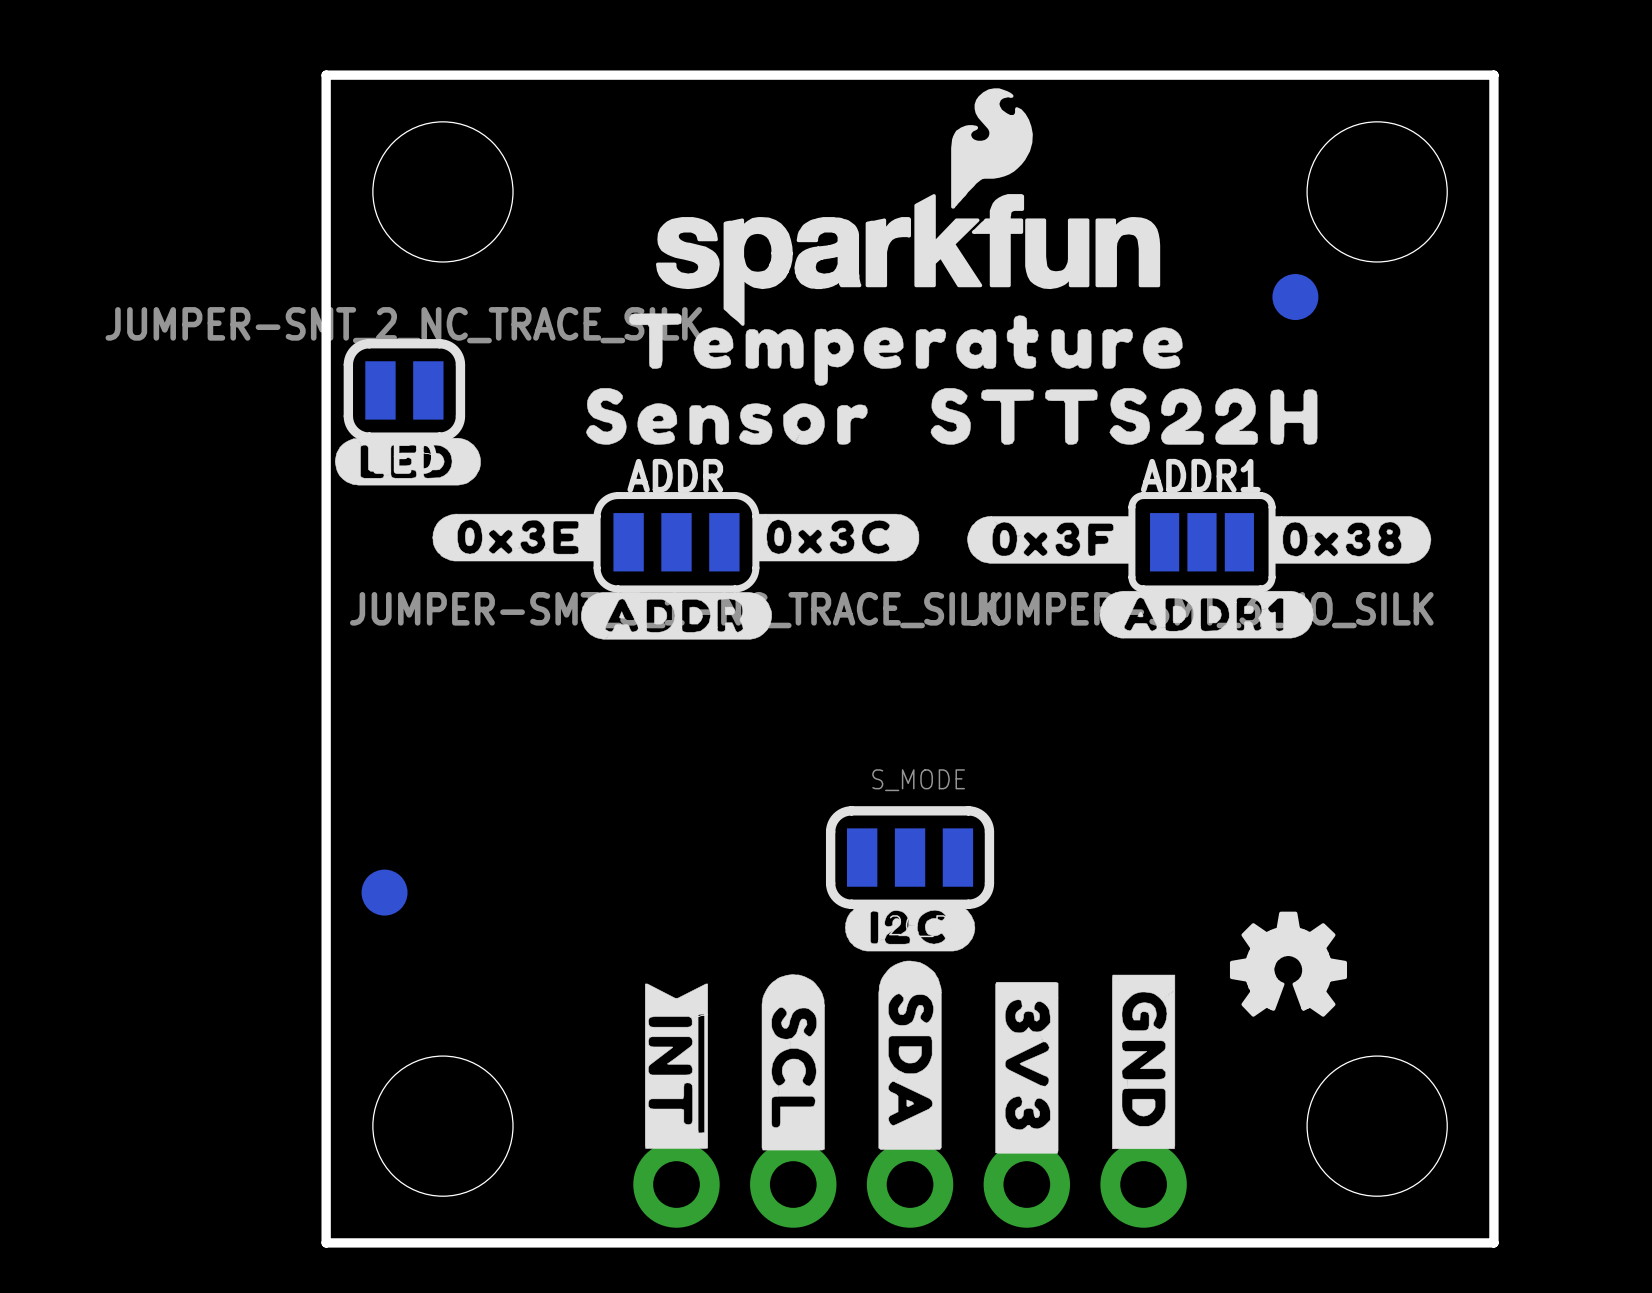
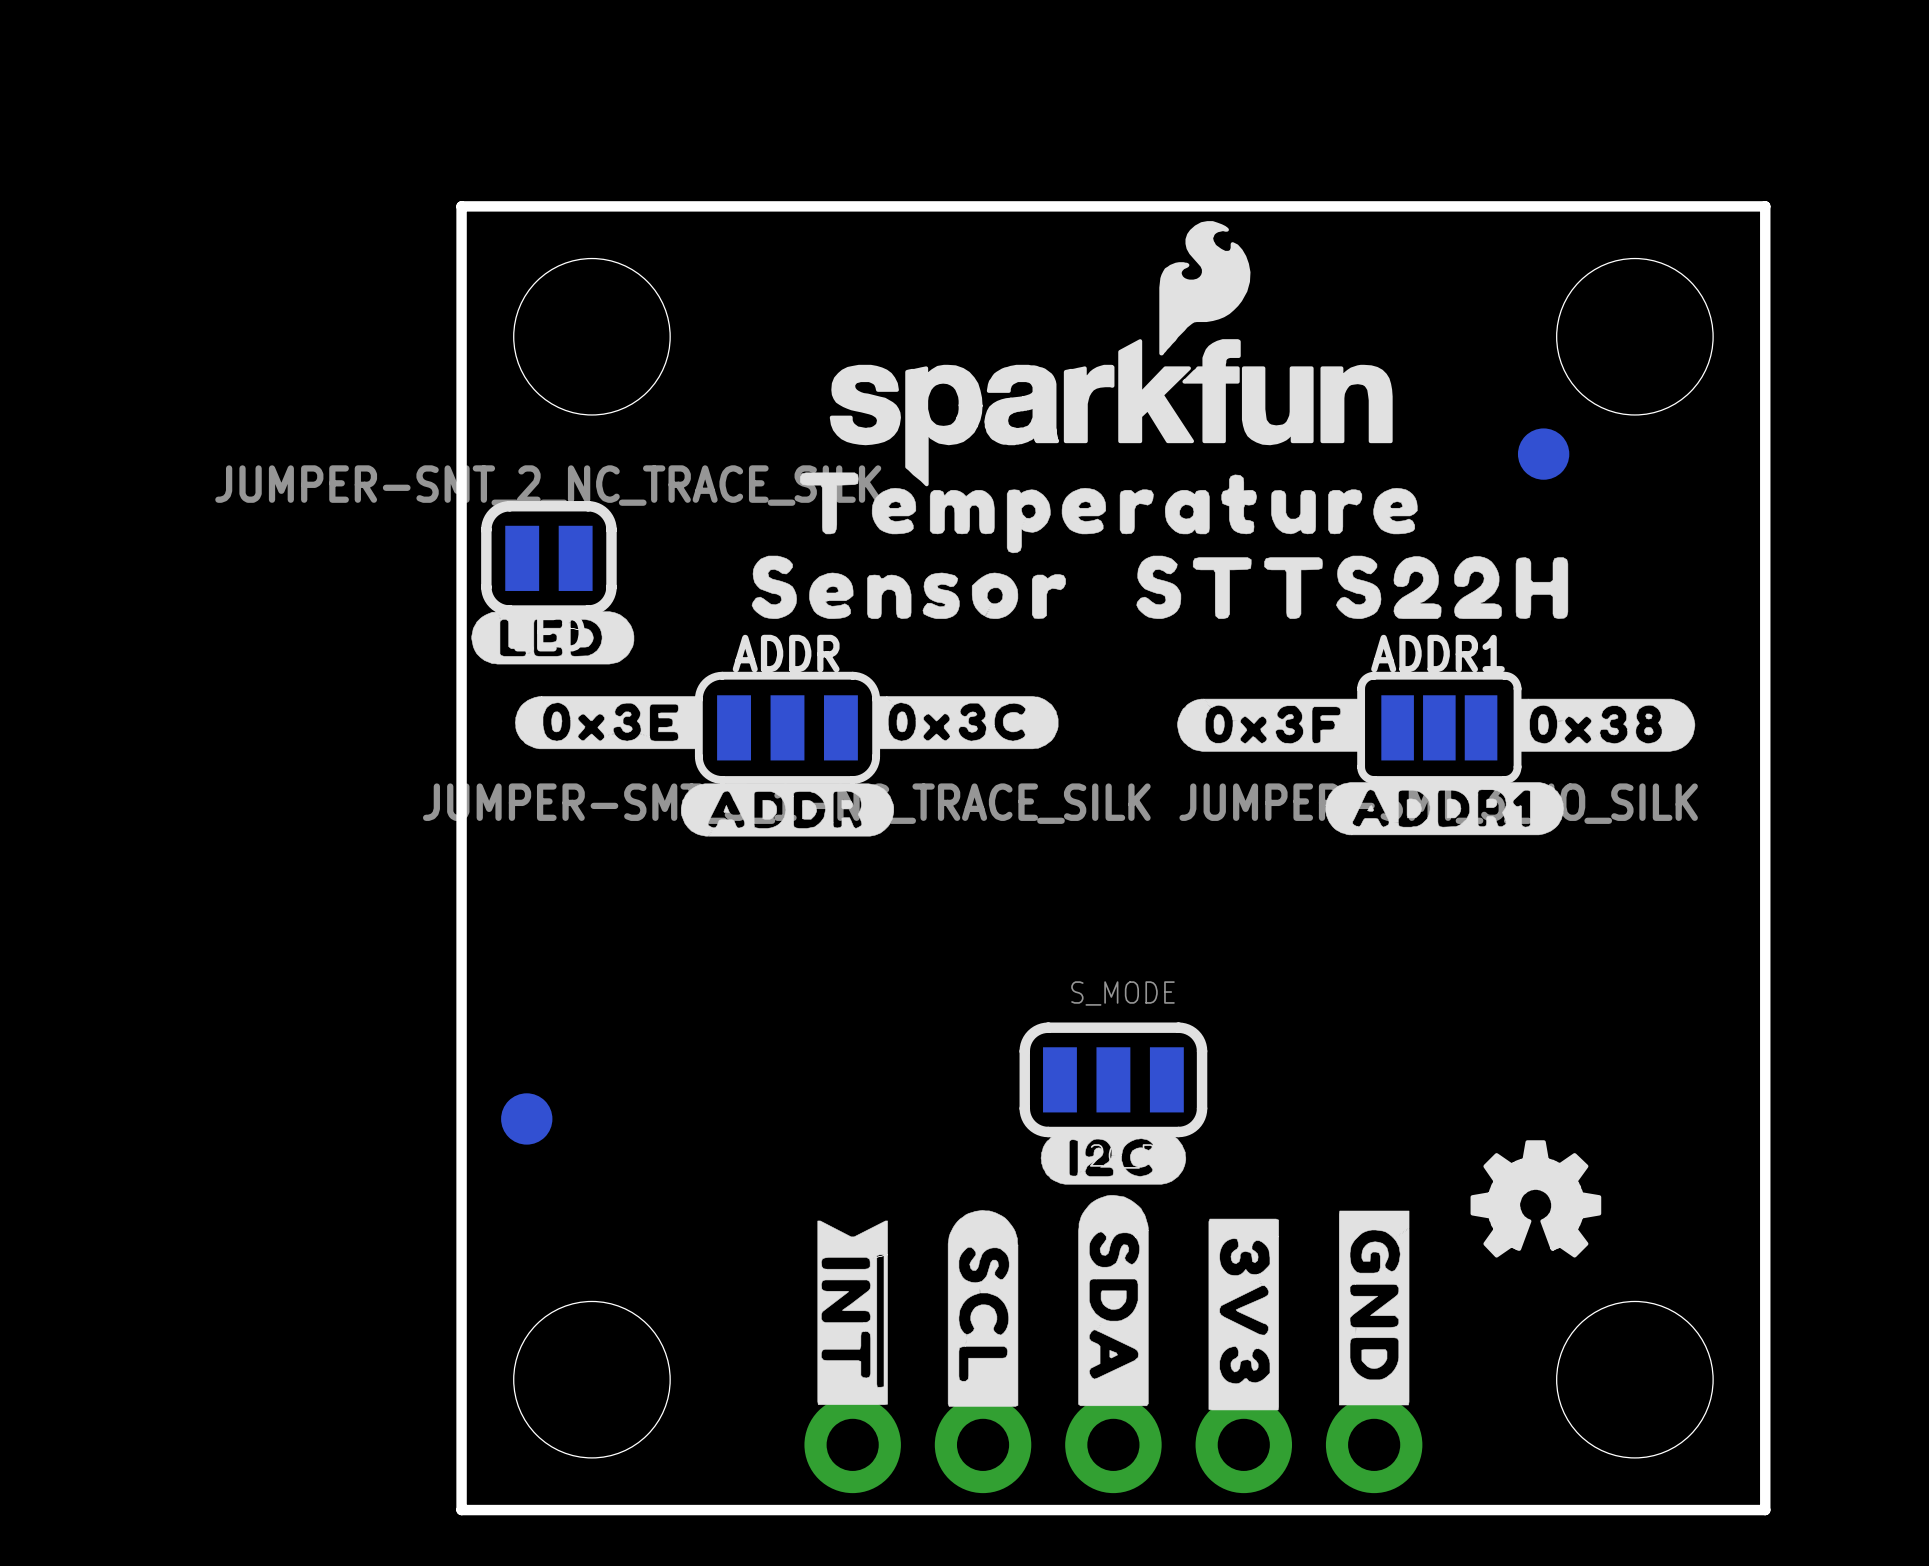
drawing position: (514, 537) -> (606, 722)
drawing position: (836, 537) -> (965, 722)
ADDR position: (676, 542) -> (787, 727)
drawing position: (676, 615) -> (787, 809)

